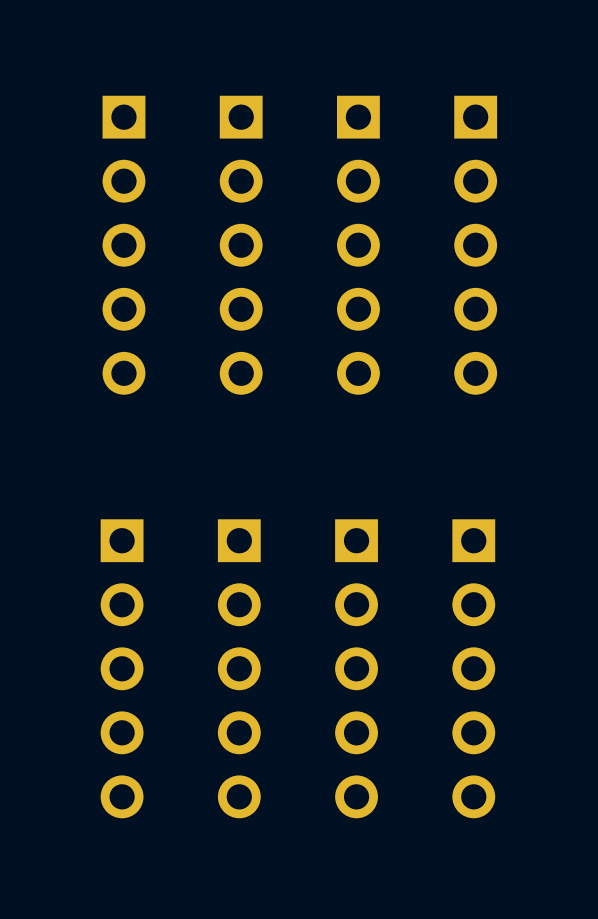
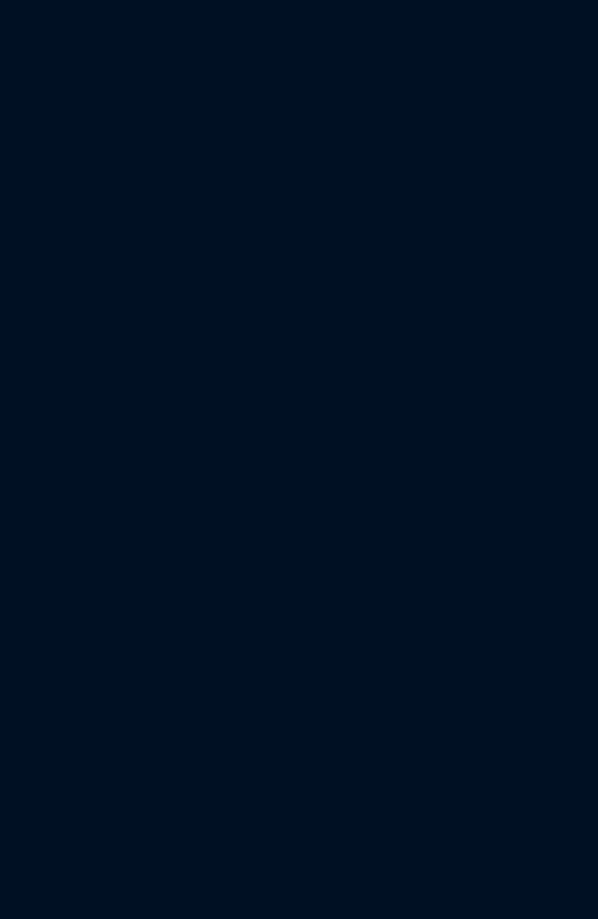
part: (123, 245) -> none
part: (241, 245) -> none
part: (358, 245) -> none
part: (475, 245) -> none
part: (122, 668) -> none
part: (239, 668) -> none
part: (356, 668) -> none
part: (473, 668) -> none

